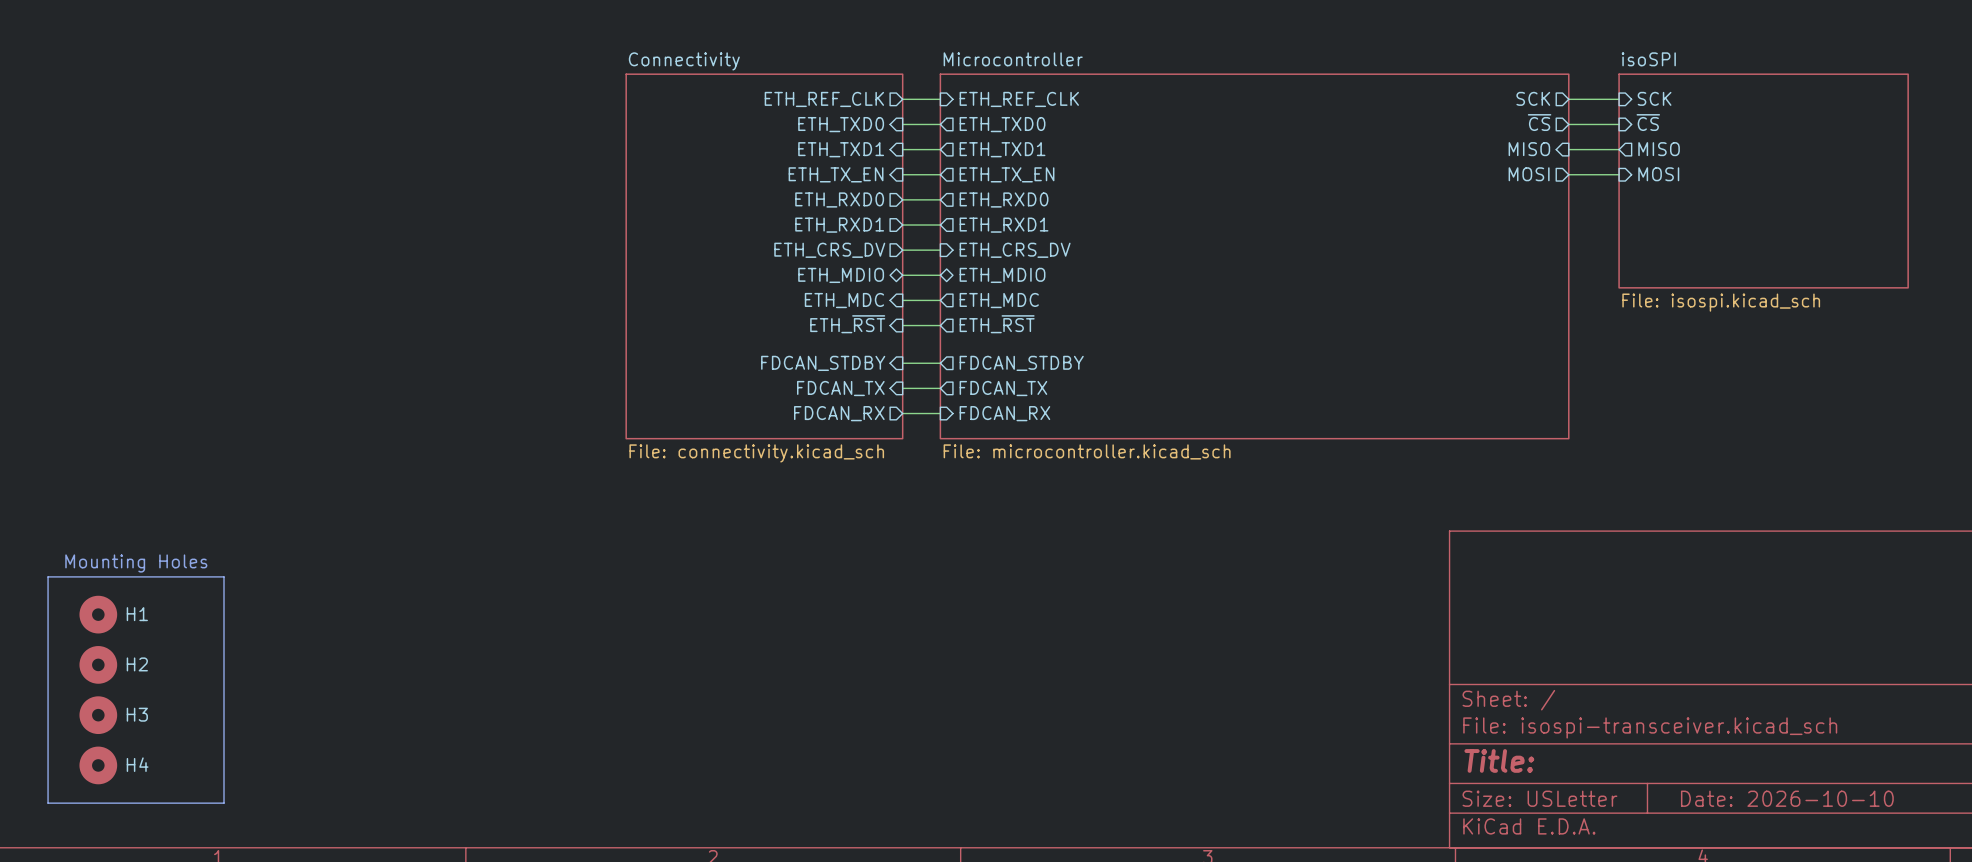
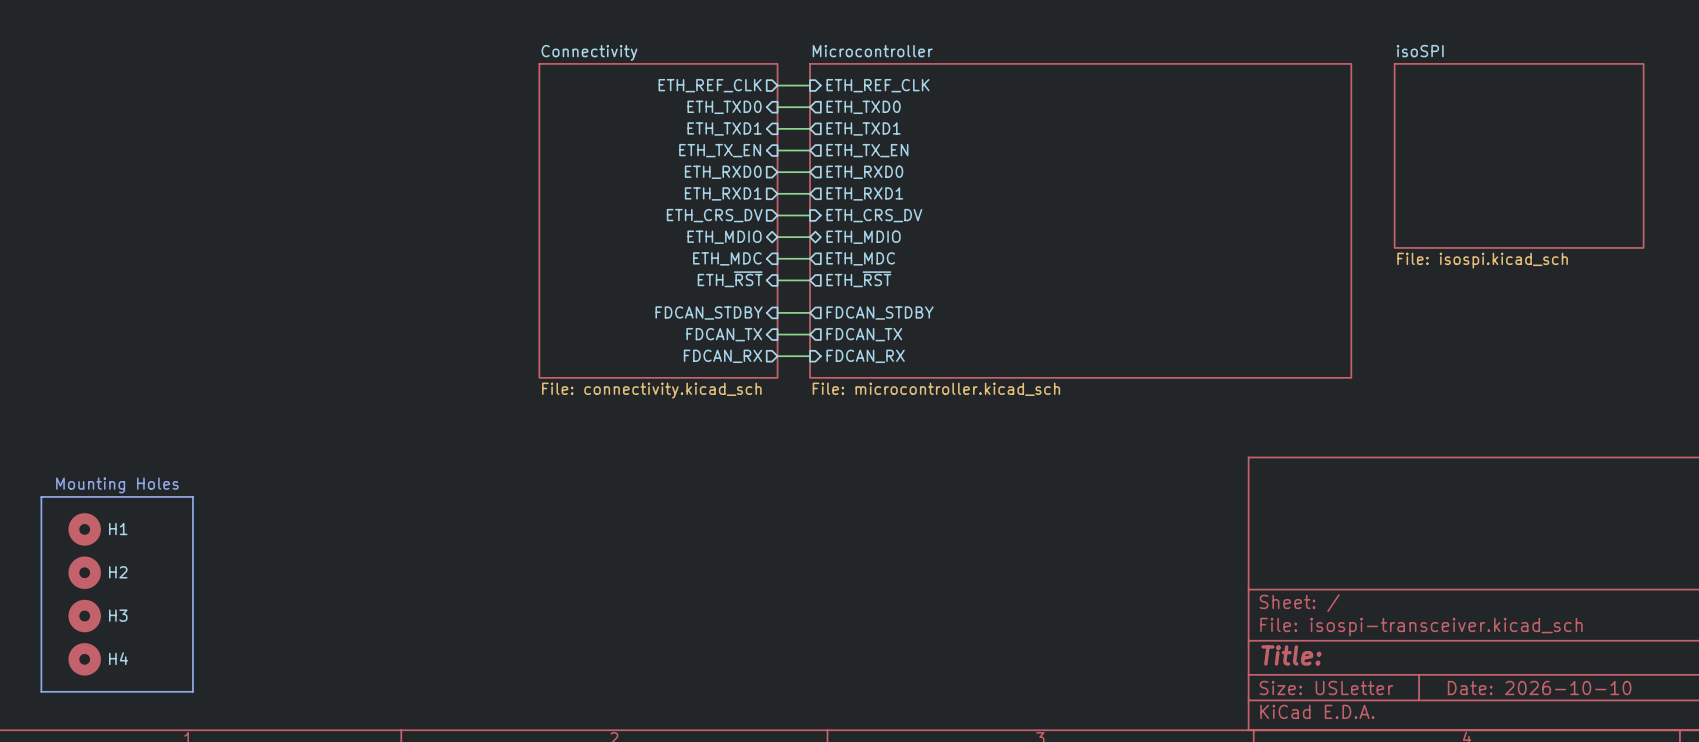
sheet pin: SCK (1533, 98) -> none
sheet pin: SCK (1654, 98) -> none
wire: (1568, 99) (1619, 99) -> none
sheet pin: ~{CS} (1539, 122) -> none
sheet pin: ~{CS} (1648, 122) -> none
wire: (1568, 124) (1619, 124) -> none
sheet pin: MISO (1529, 149) -> none
wire: (1568, 149) (1619, 149) -> none
sheet pin: MISO (1659, 149) -> none
sheet pin: MOSI (1529, 174) -> none
wire: (1568, 174) (1619, 174) -> none
sheet pin: MOSI (1658, 174) -> none

